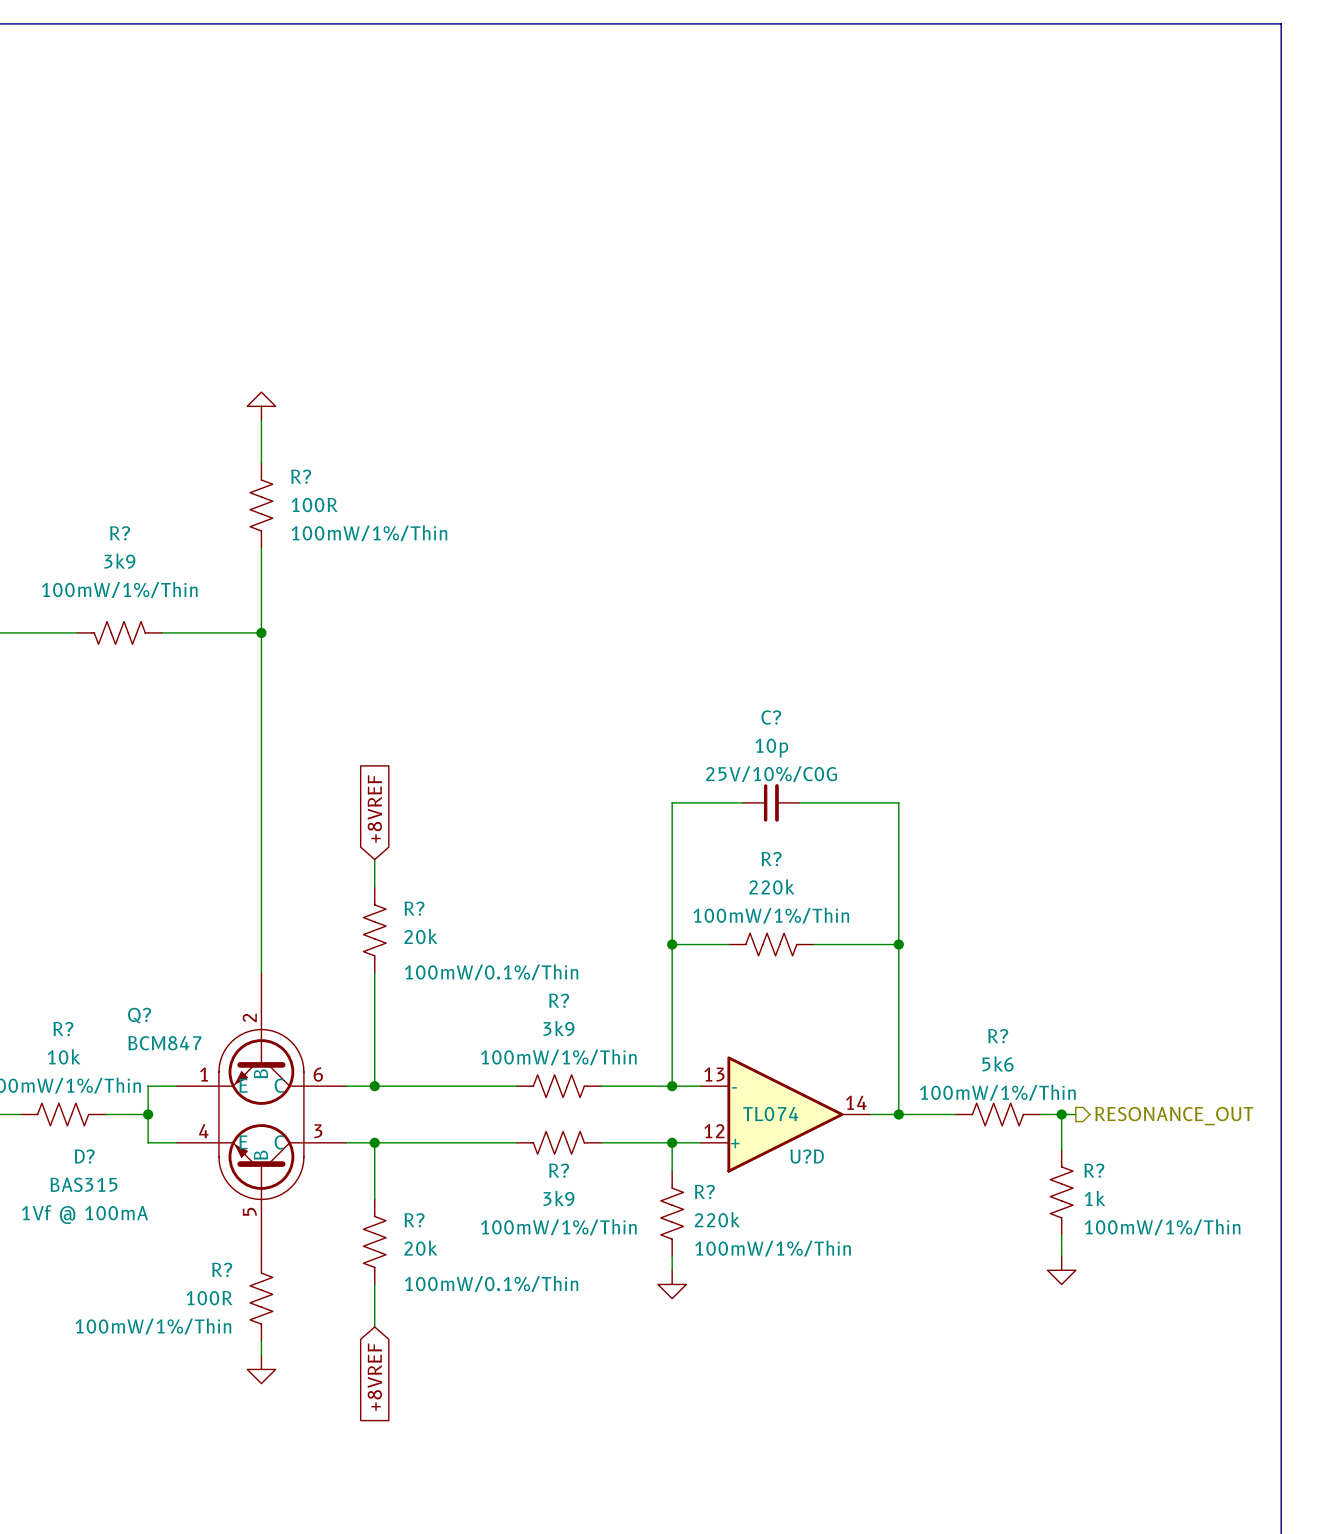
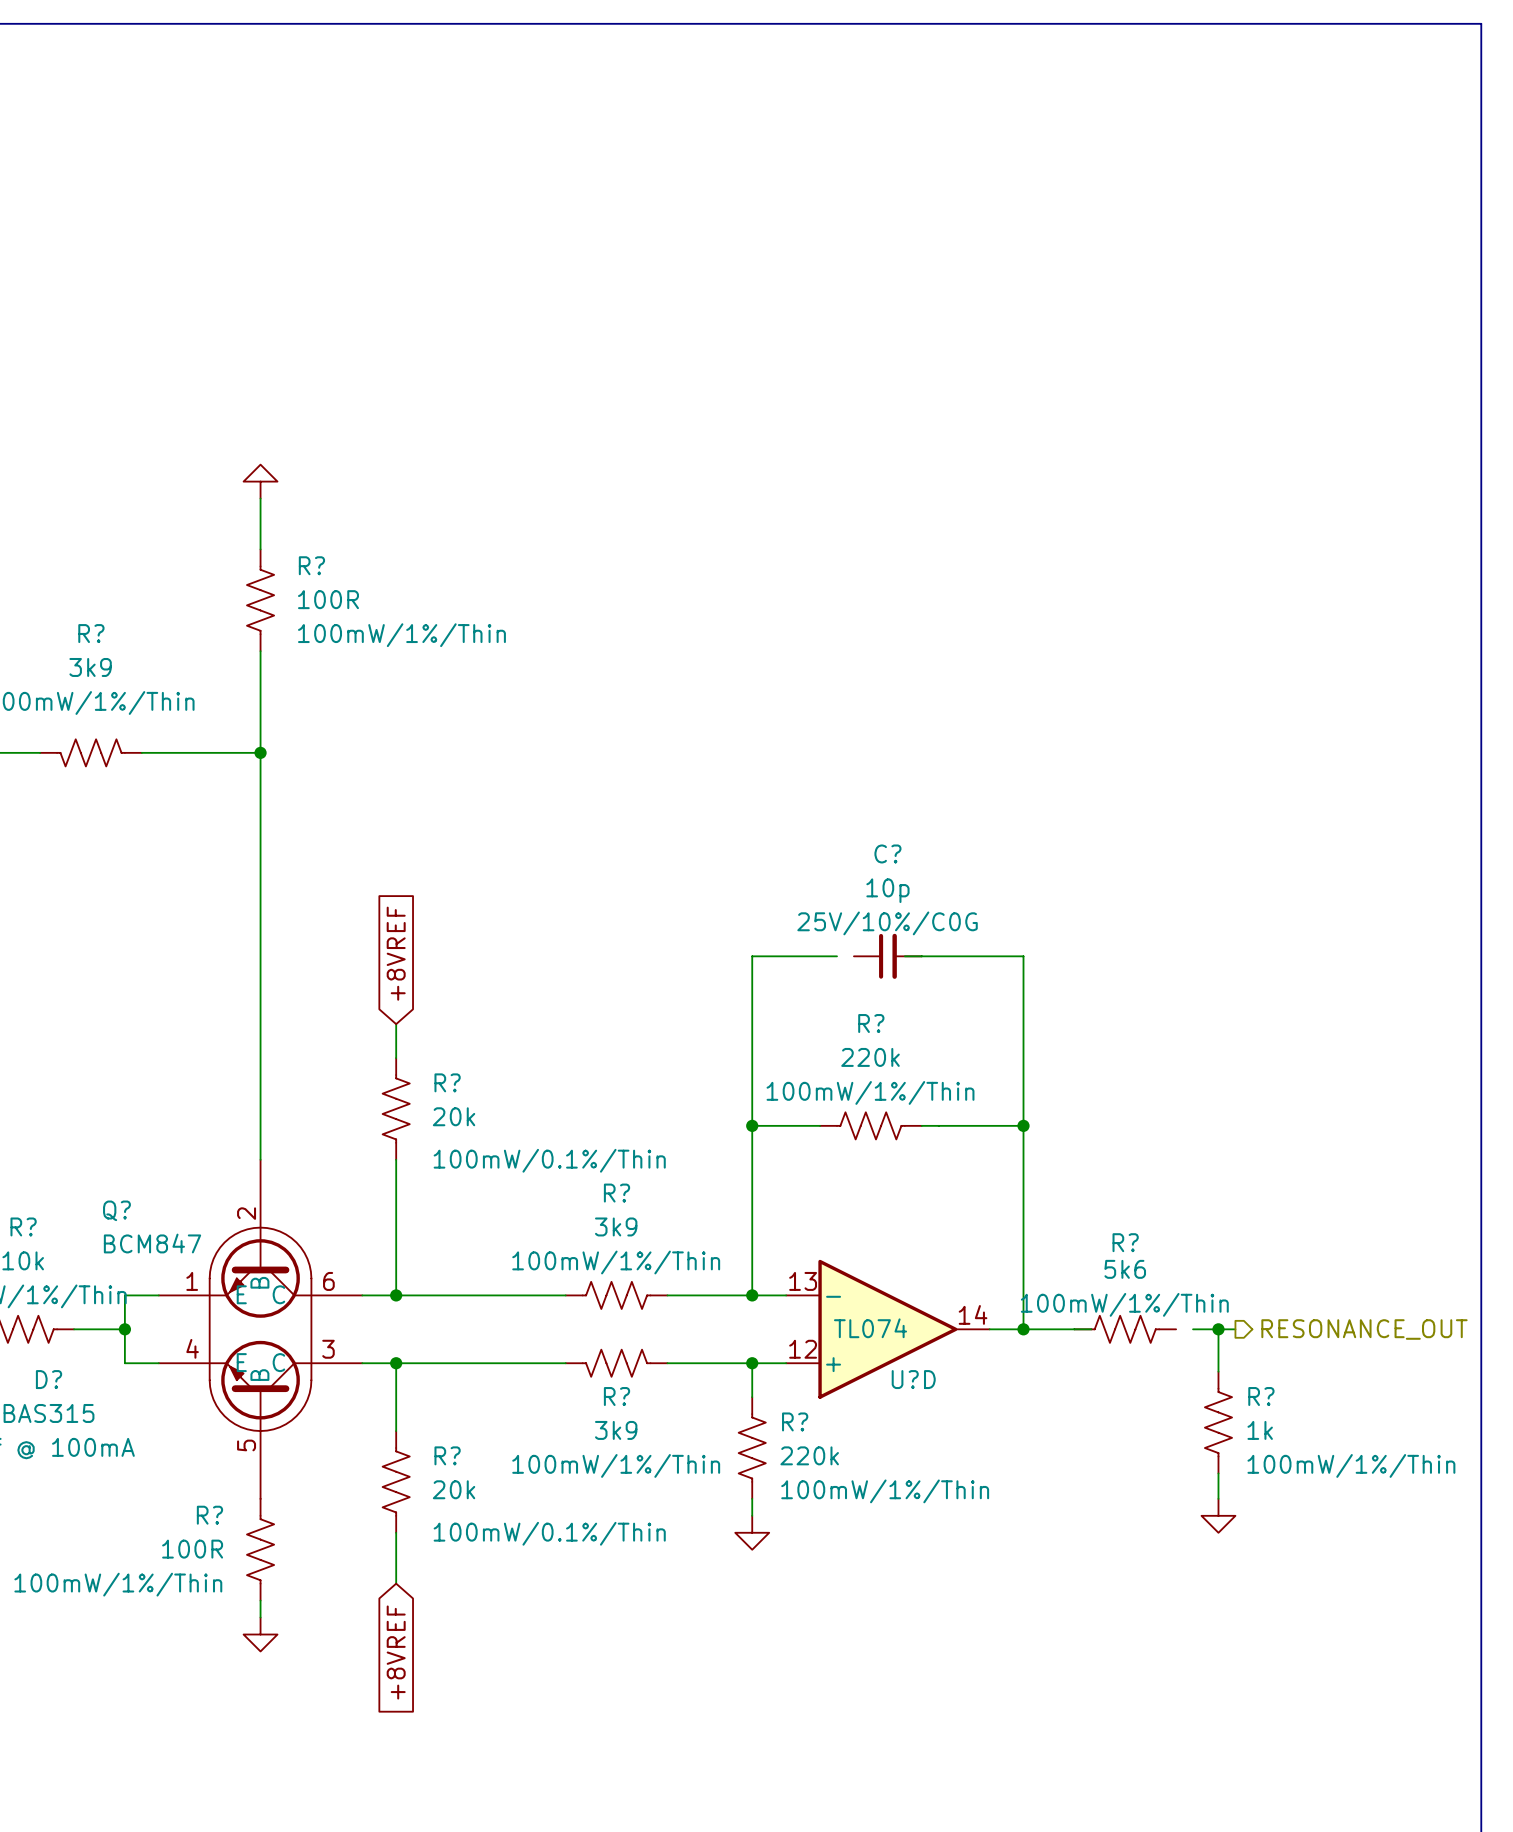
C? position: (771, 802) -> (887, 956)
R? name position: R? (998, 1036) -> R? (1125, 1242)
R? position: (997, 1114) -> (1125, 1329)

